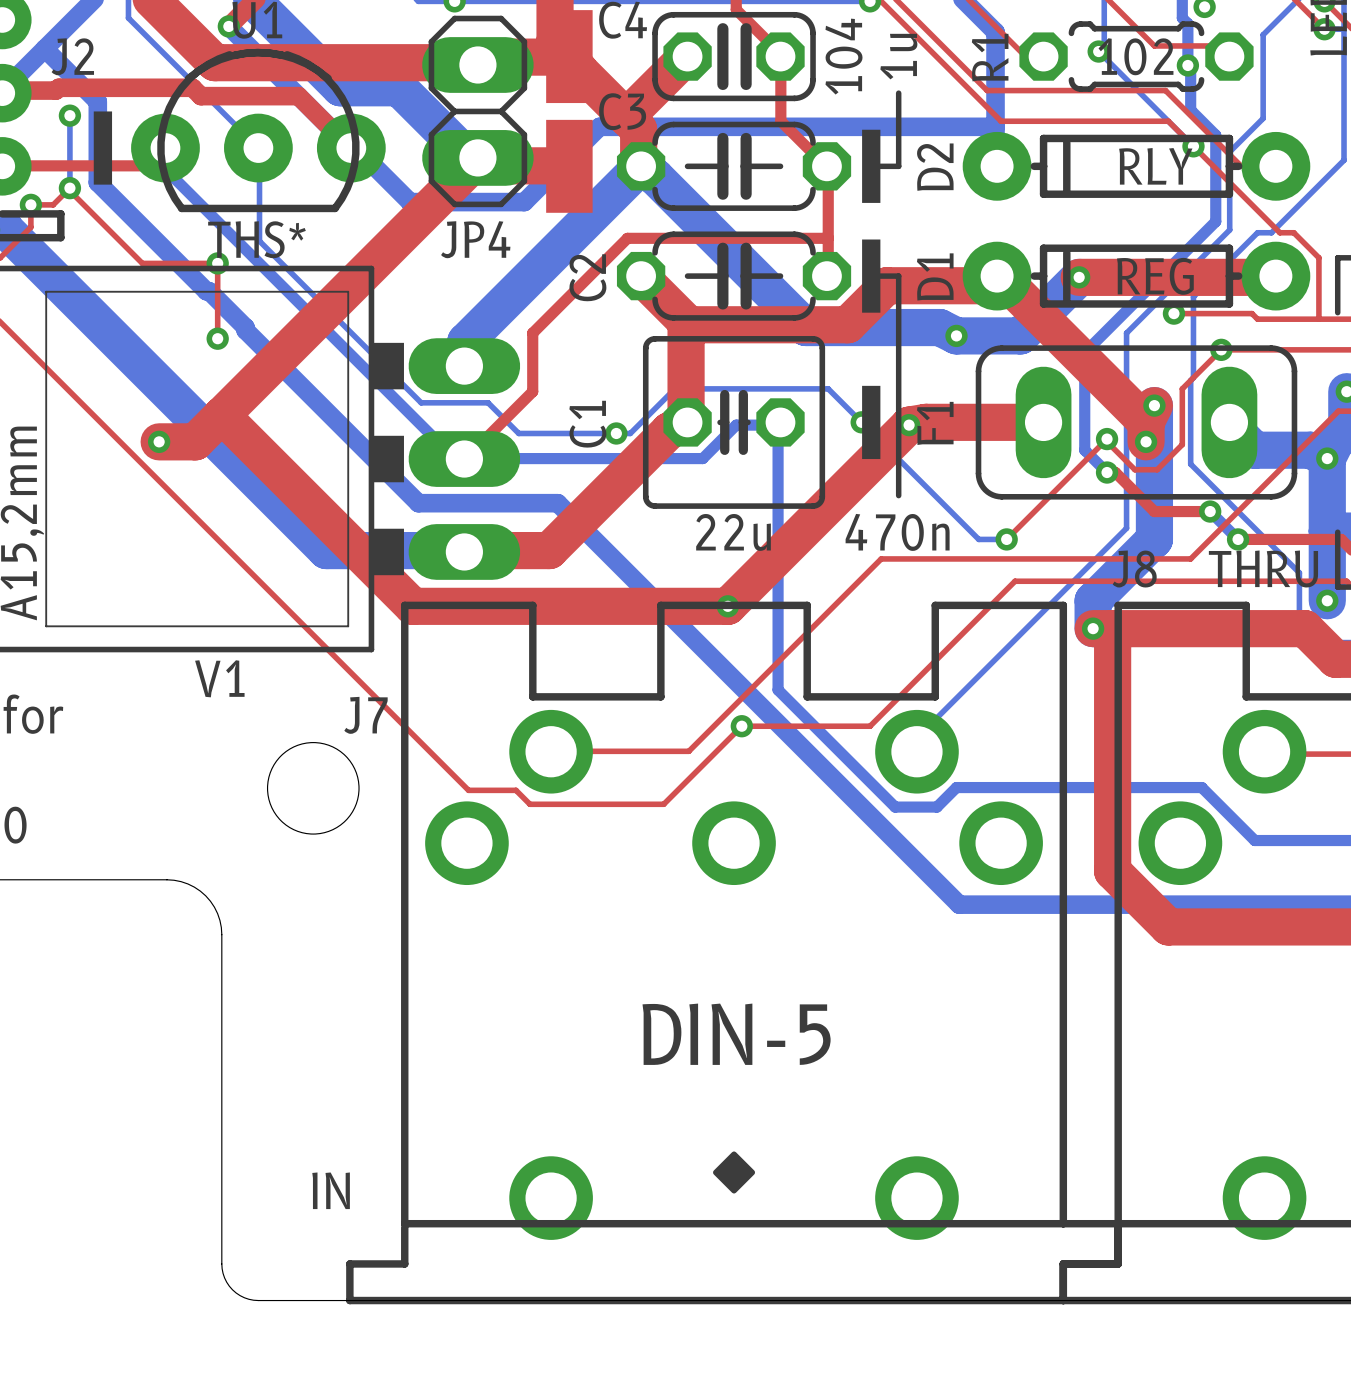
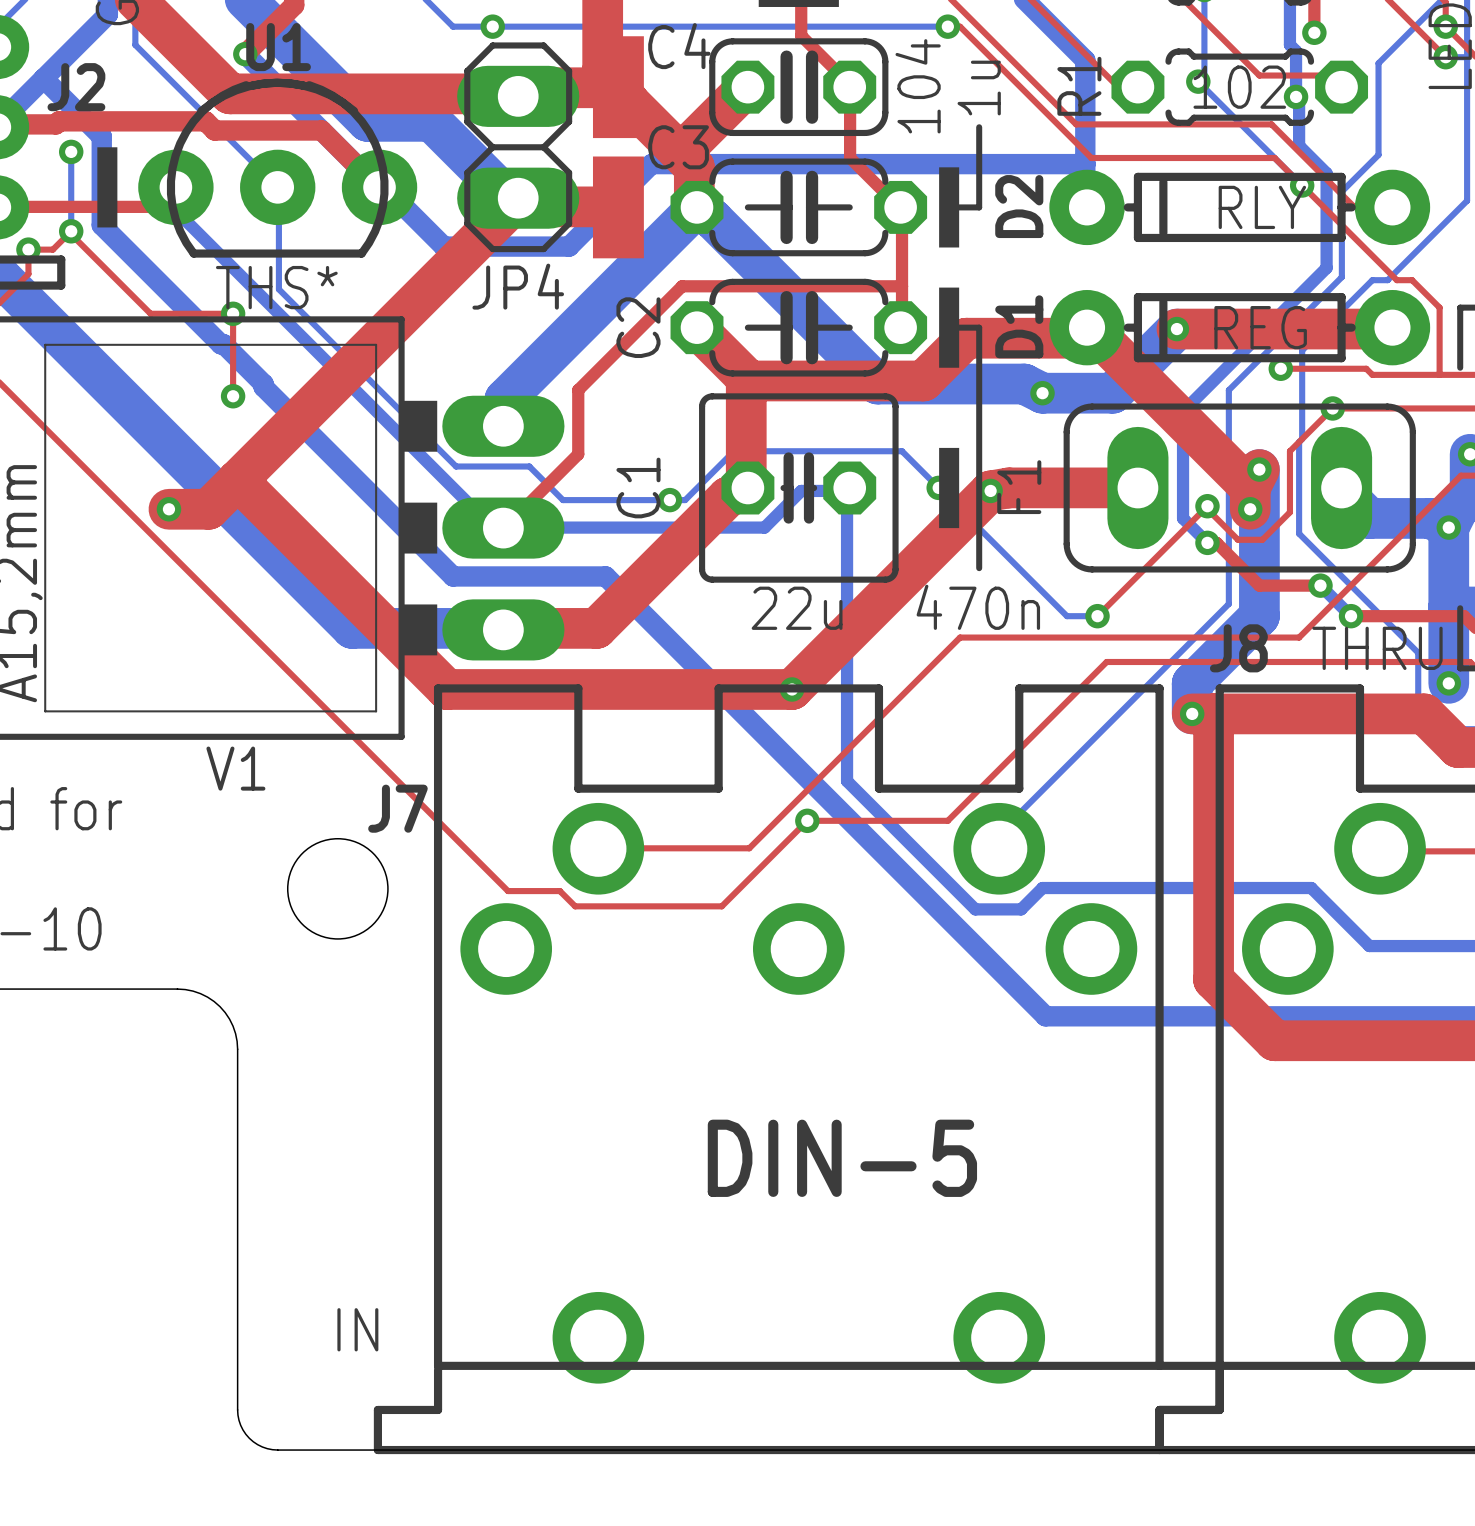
drawing: [713, 1151, 756, 1194] -> none

